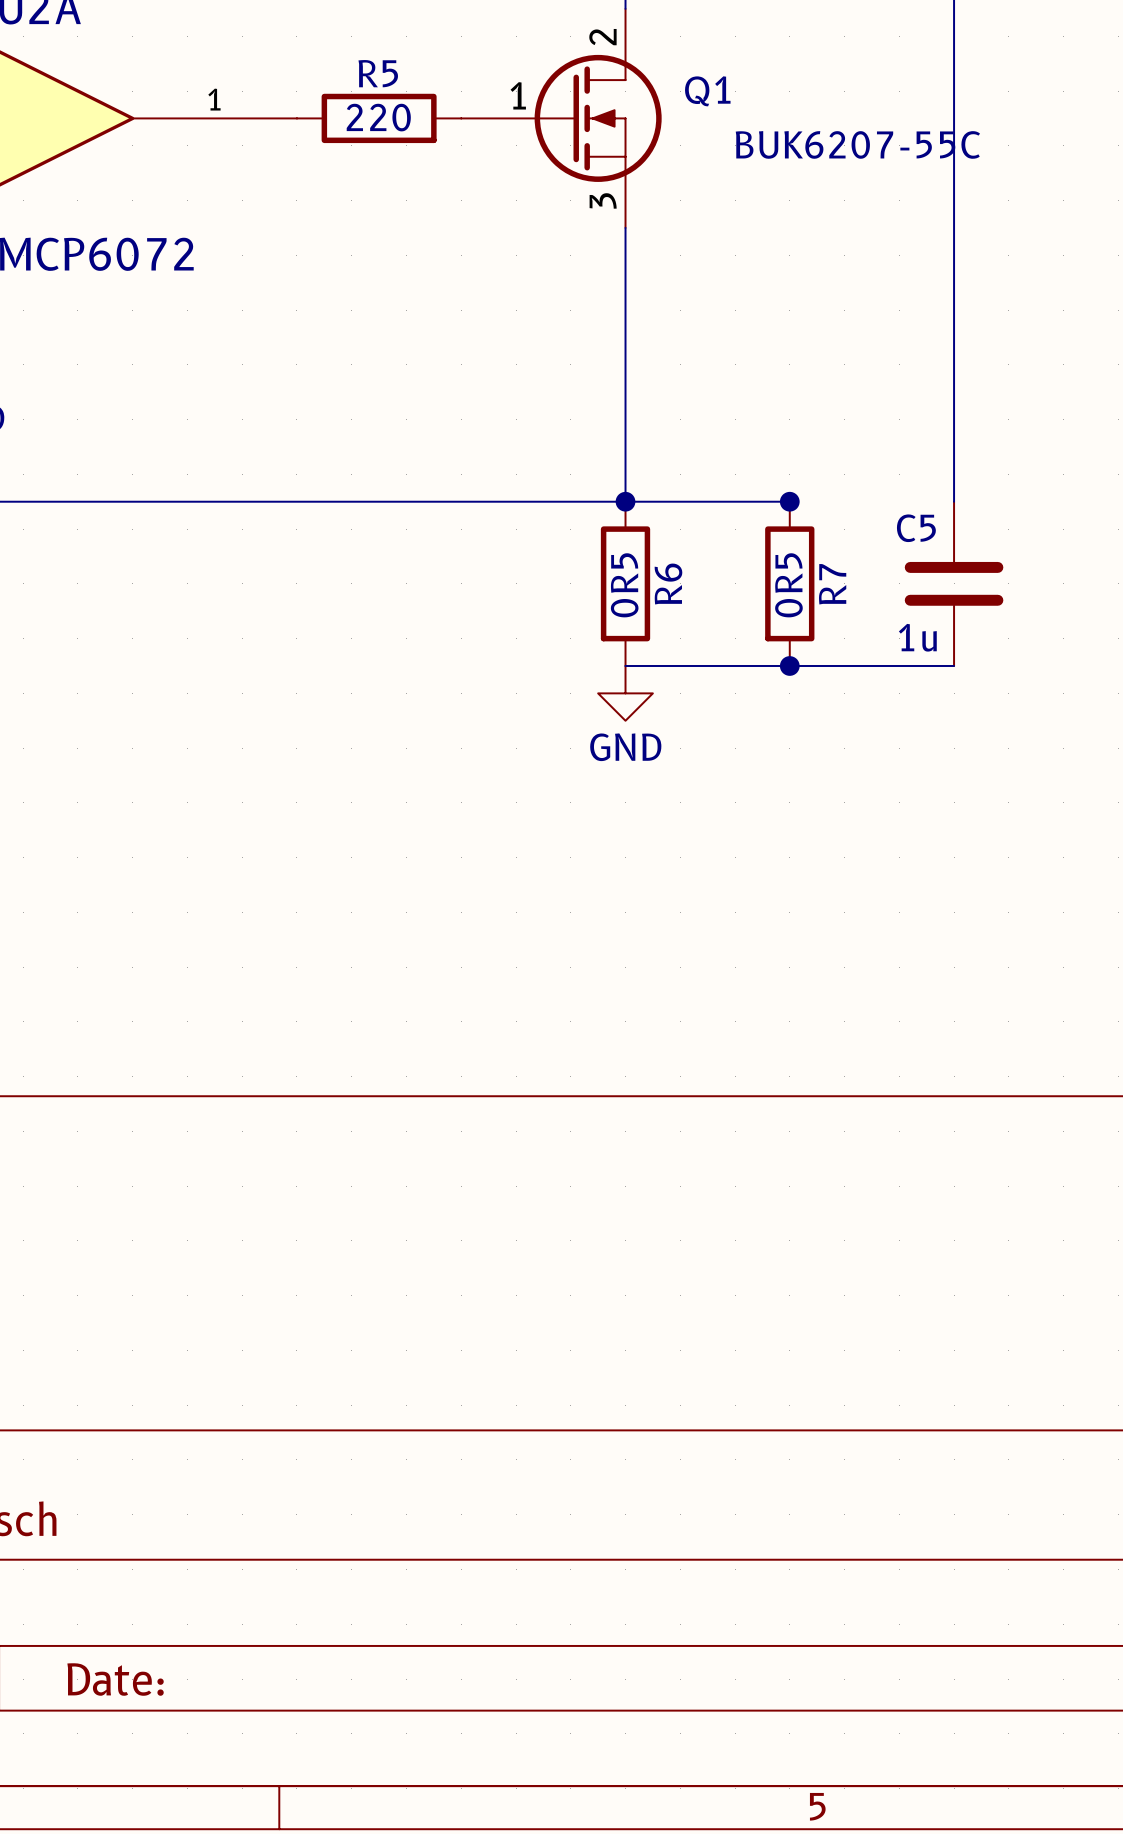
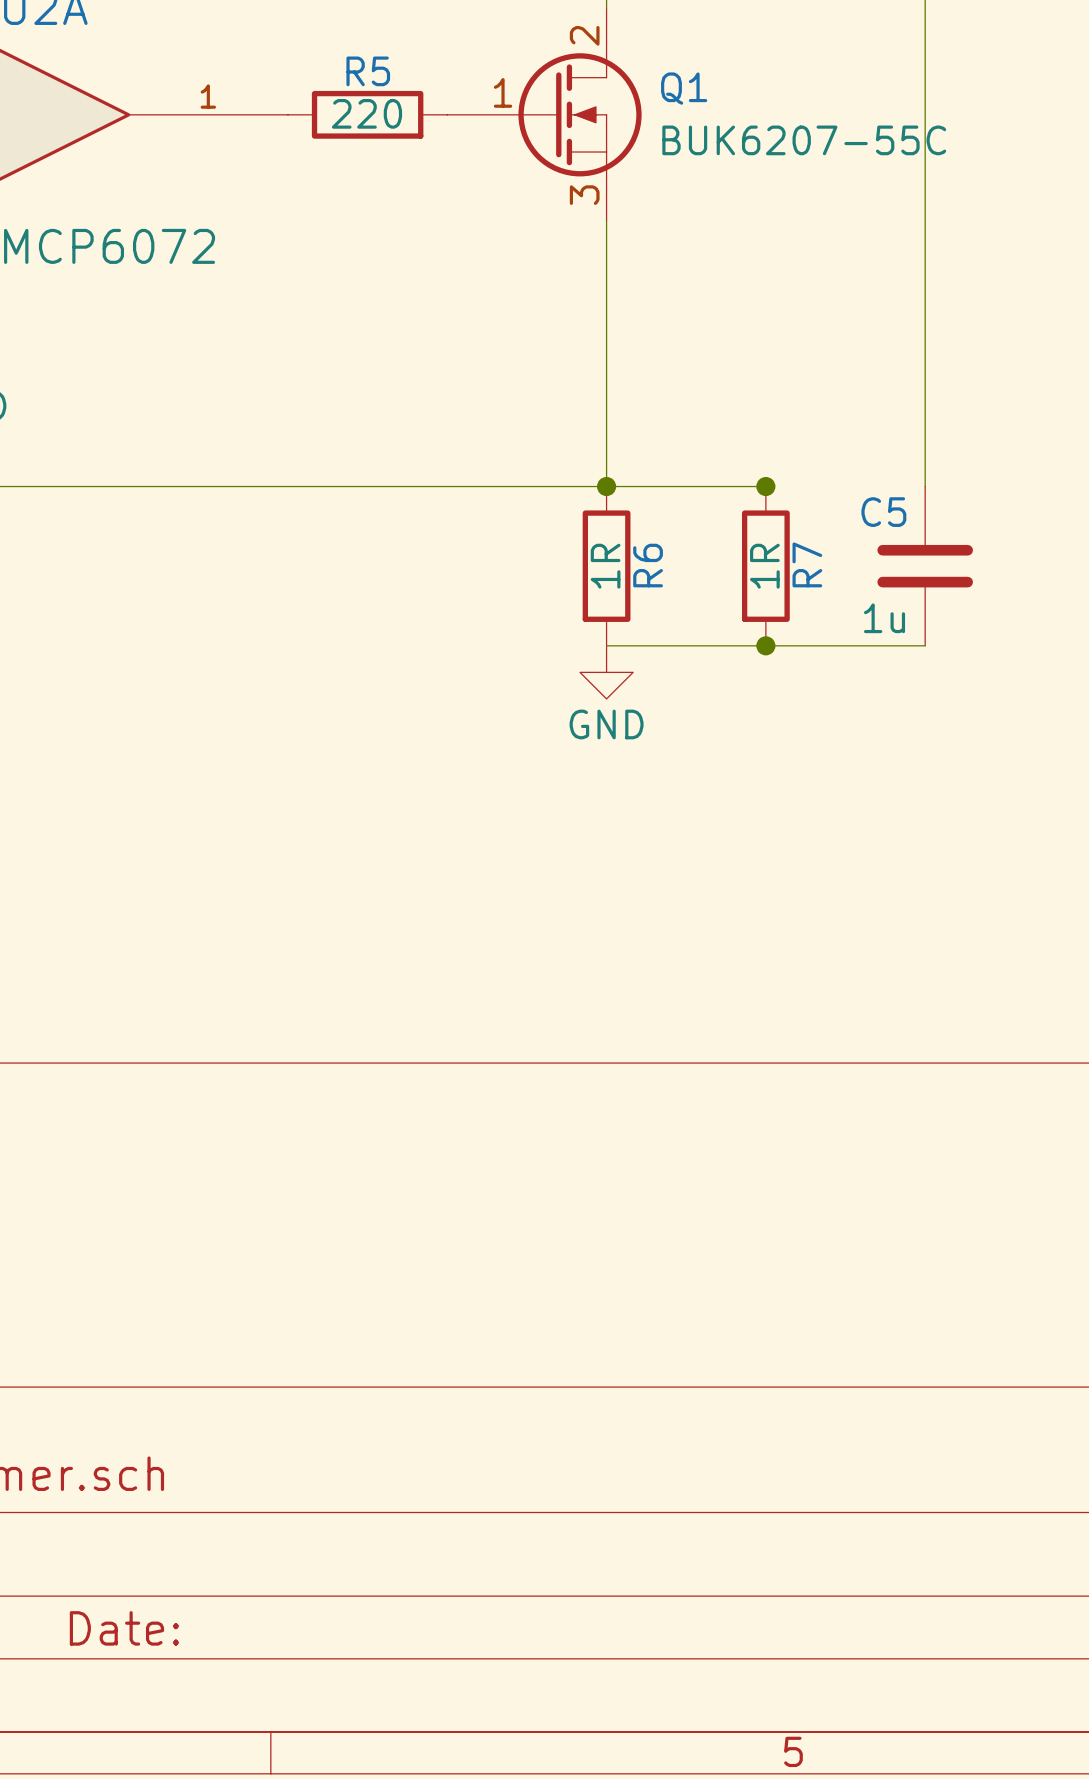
R6 value: 0R5 (624, 585) -> 1R (605, 566)
R7 value: 0R5 (788, 585) -> 1R (764, 566)

